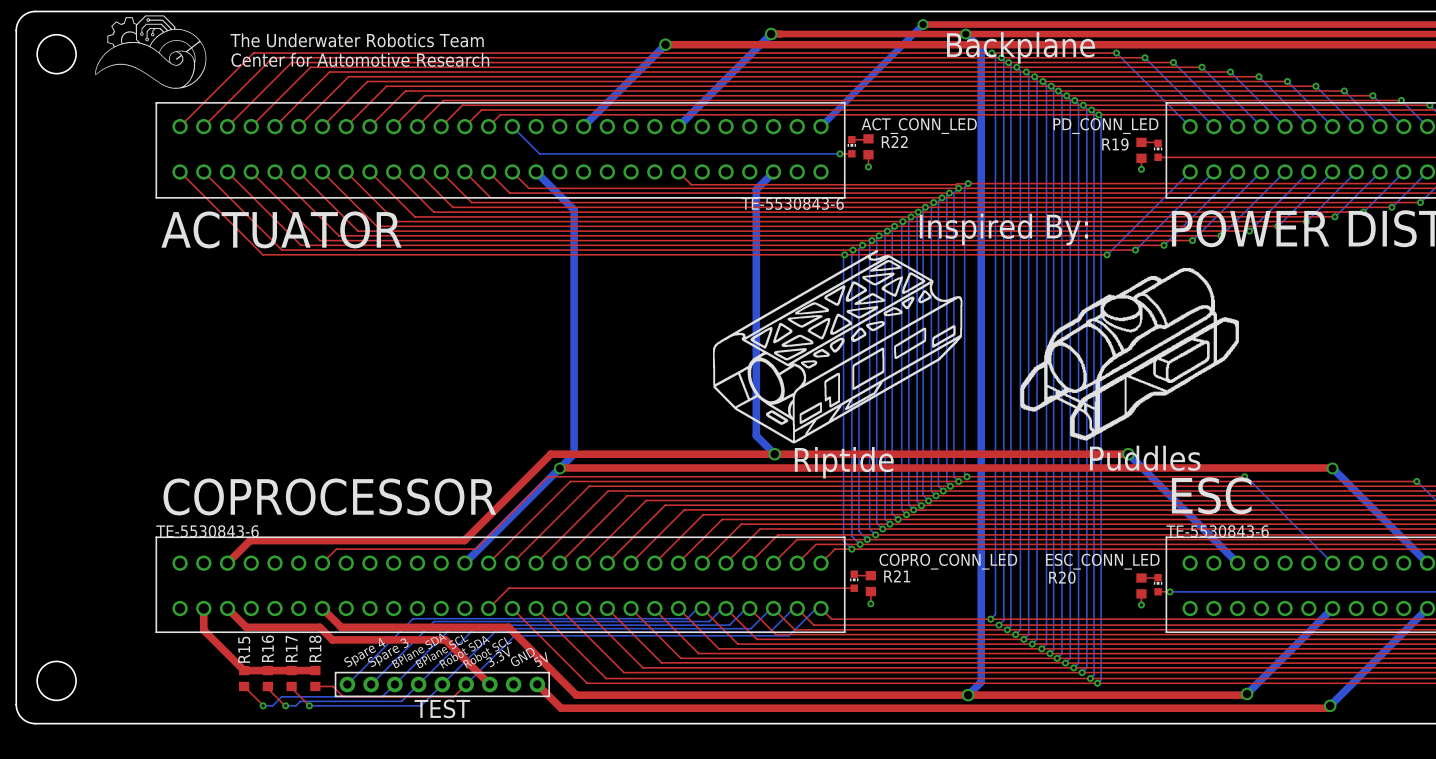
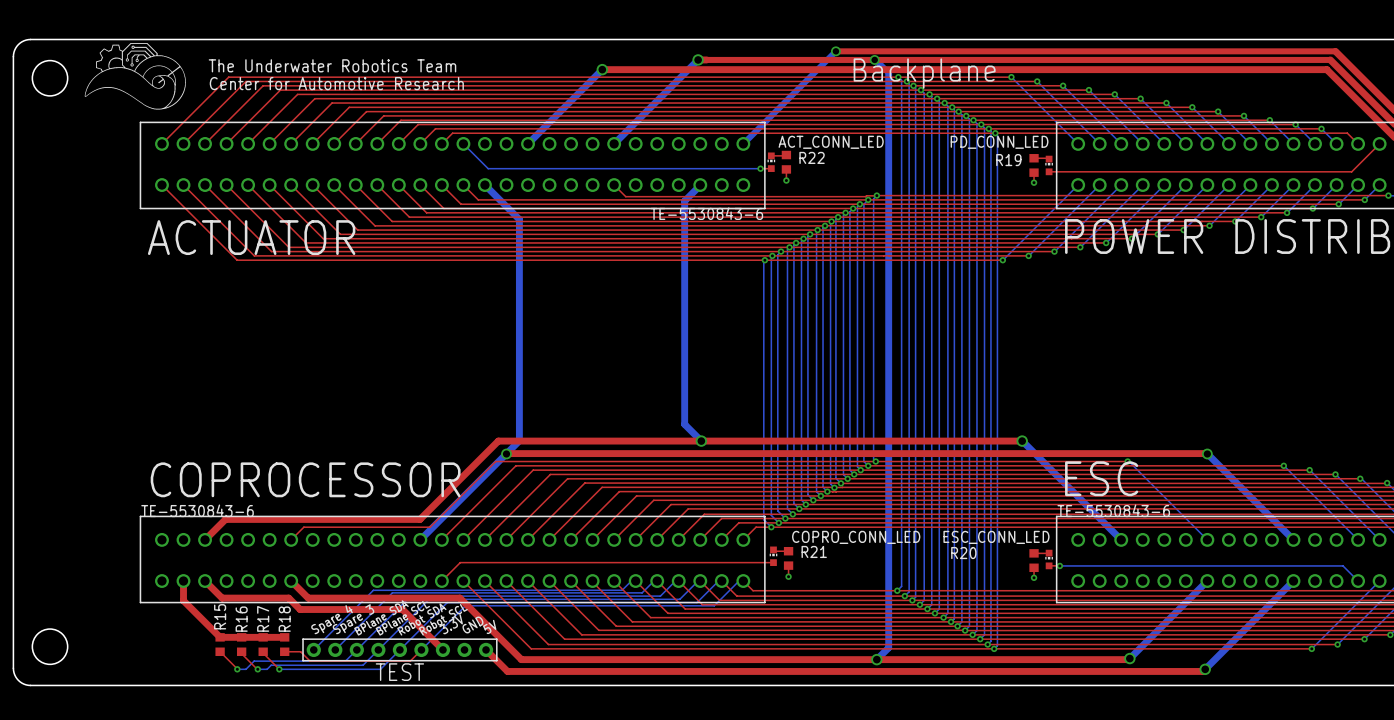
text: Inspired By: (1003, 229) -> none
drawing: [713, 250, 963, 444] -> none
drawing: [1020, 268, 1239, 441] -> none
text: Puddles (1145, 458) -> none
text: Riptide (844, 462) -> none

